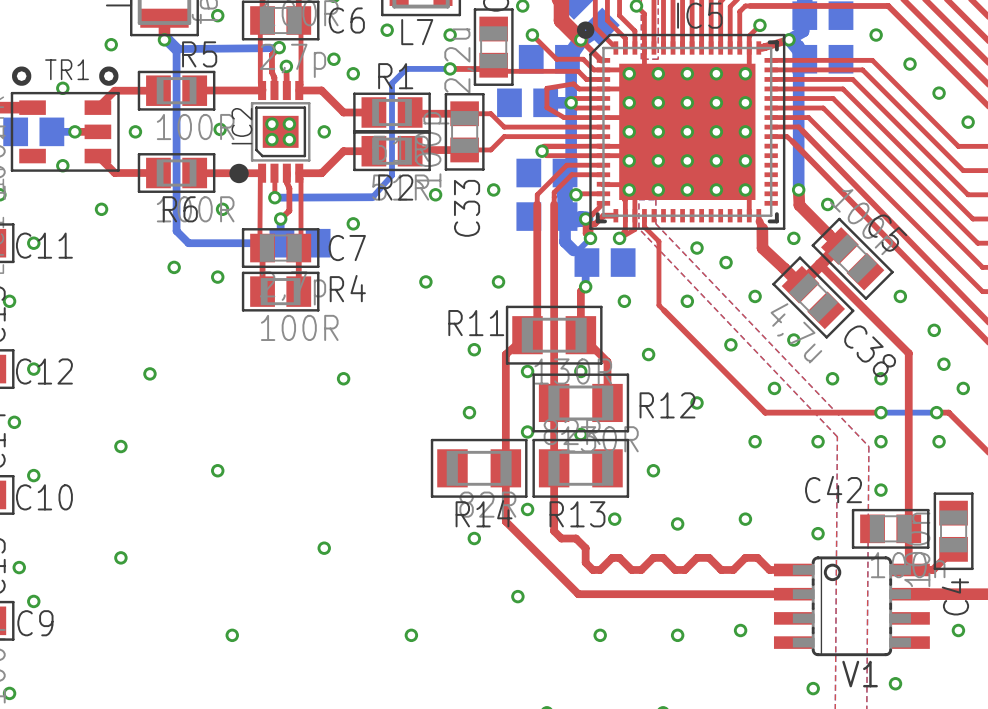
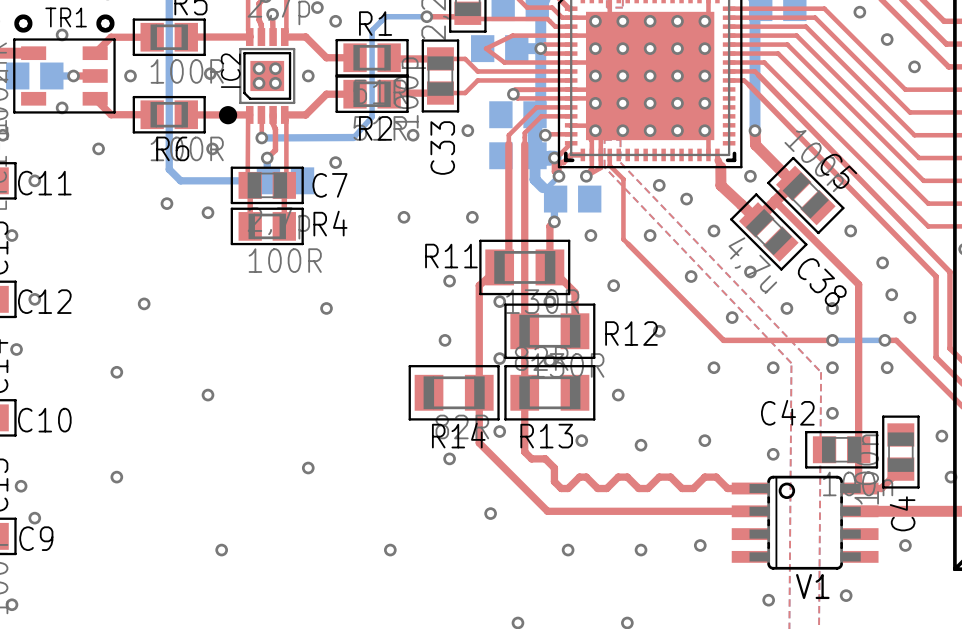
top track: (579, 88) (573, 83) (546, 88) (546, 107) (564, 117) -> (548, 35) (512, 35) (486, 48) (504, 62) (534, 62)
via: (827, 204) -> none
via: (33, 475) -> none

